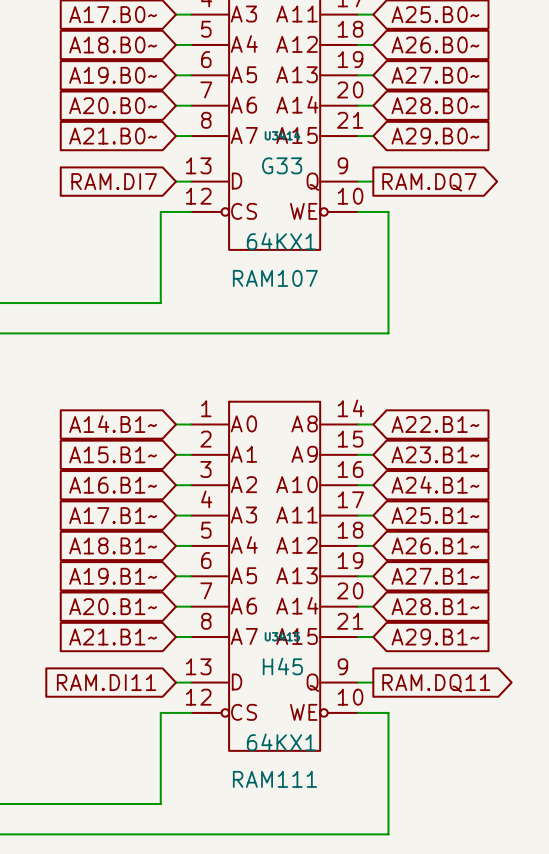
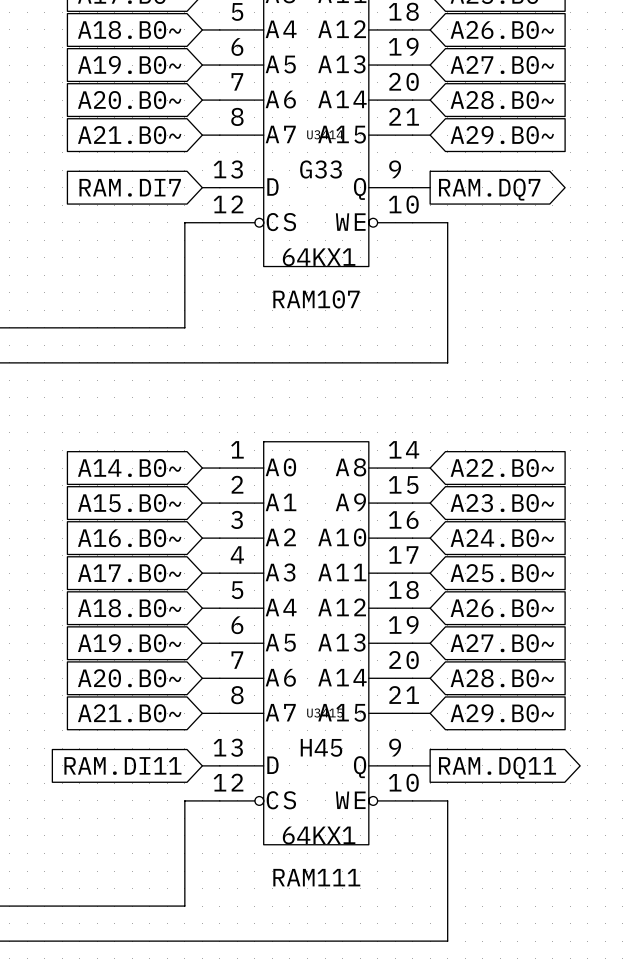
global label: A14.B1~ (113, 424) -> A14.B0~ (129, 468)
global label: A22.B1~ (435, 424) -> A22.B0~ (502, 468)
global label: A15.B1~ (113, 454) -> A15.B0~ (129, 503)
global label: A23.B1~ (435, 454) -> A23.B0~ (502, 503)
global label: A24.B1~ (435, 484) -> A24.B0~ (502, 538)
global label: A16.B1~ (113, 485) -> A16.B0~ (129, 538)
global label: A17.B1~ (113, 515) -> A17.B0~ (129, 573)
global label: A25.B1~ (435, 515) -> A25.B0~ (502, 573)
global label: A18.B1~ (113, 545) -> A18.B0~ (129, 608)
global label: A26.B1~ (435, 545) -> A26.B0~ (502, 608)
global label: A19.B1~ (113, 576) -> A19.B0~ (129, 643)
global label: A27.B1~ (435, 576) -> A27.B0~ (502, 643)
global label: A20.B1~ (113, 606) -> A20.B0~ (129, 678)
global label: A28.B1~ (435, 606) -> A28.B0~ (502, 678)
global label: A21.B1~ (113, 637) -> A21.B0~ (129, 713)
global label: A29.B1~ (435, 637) -> A29.B0~ (502, 713)

